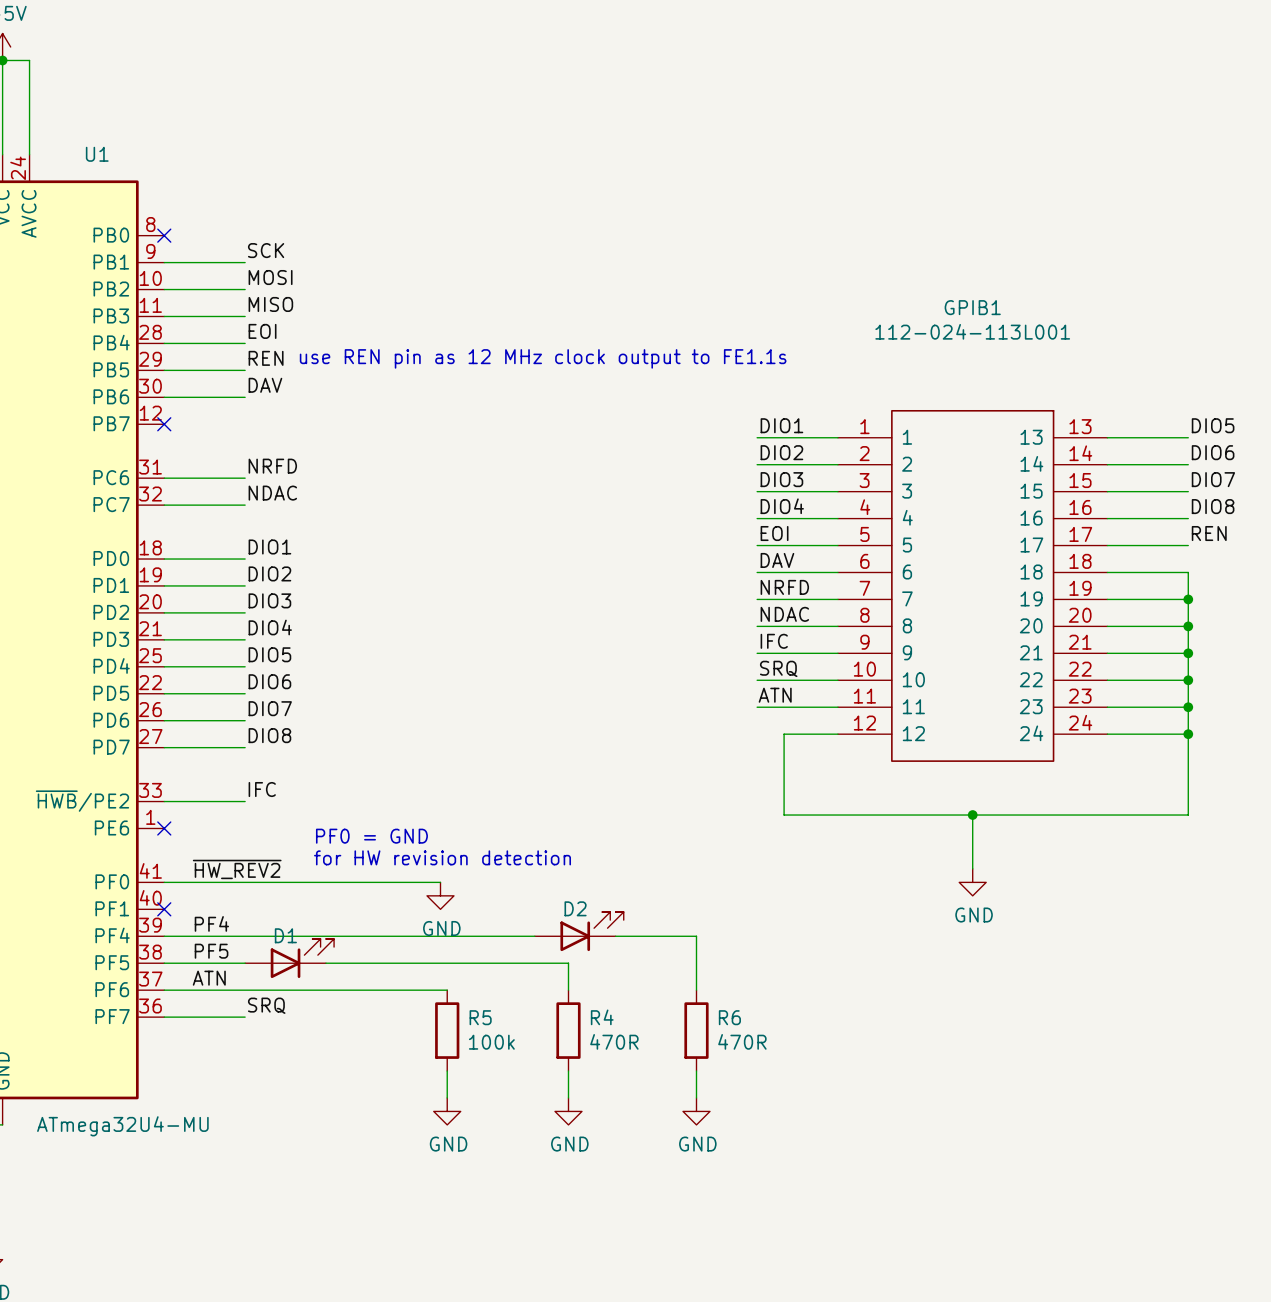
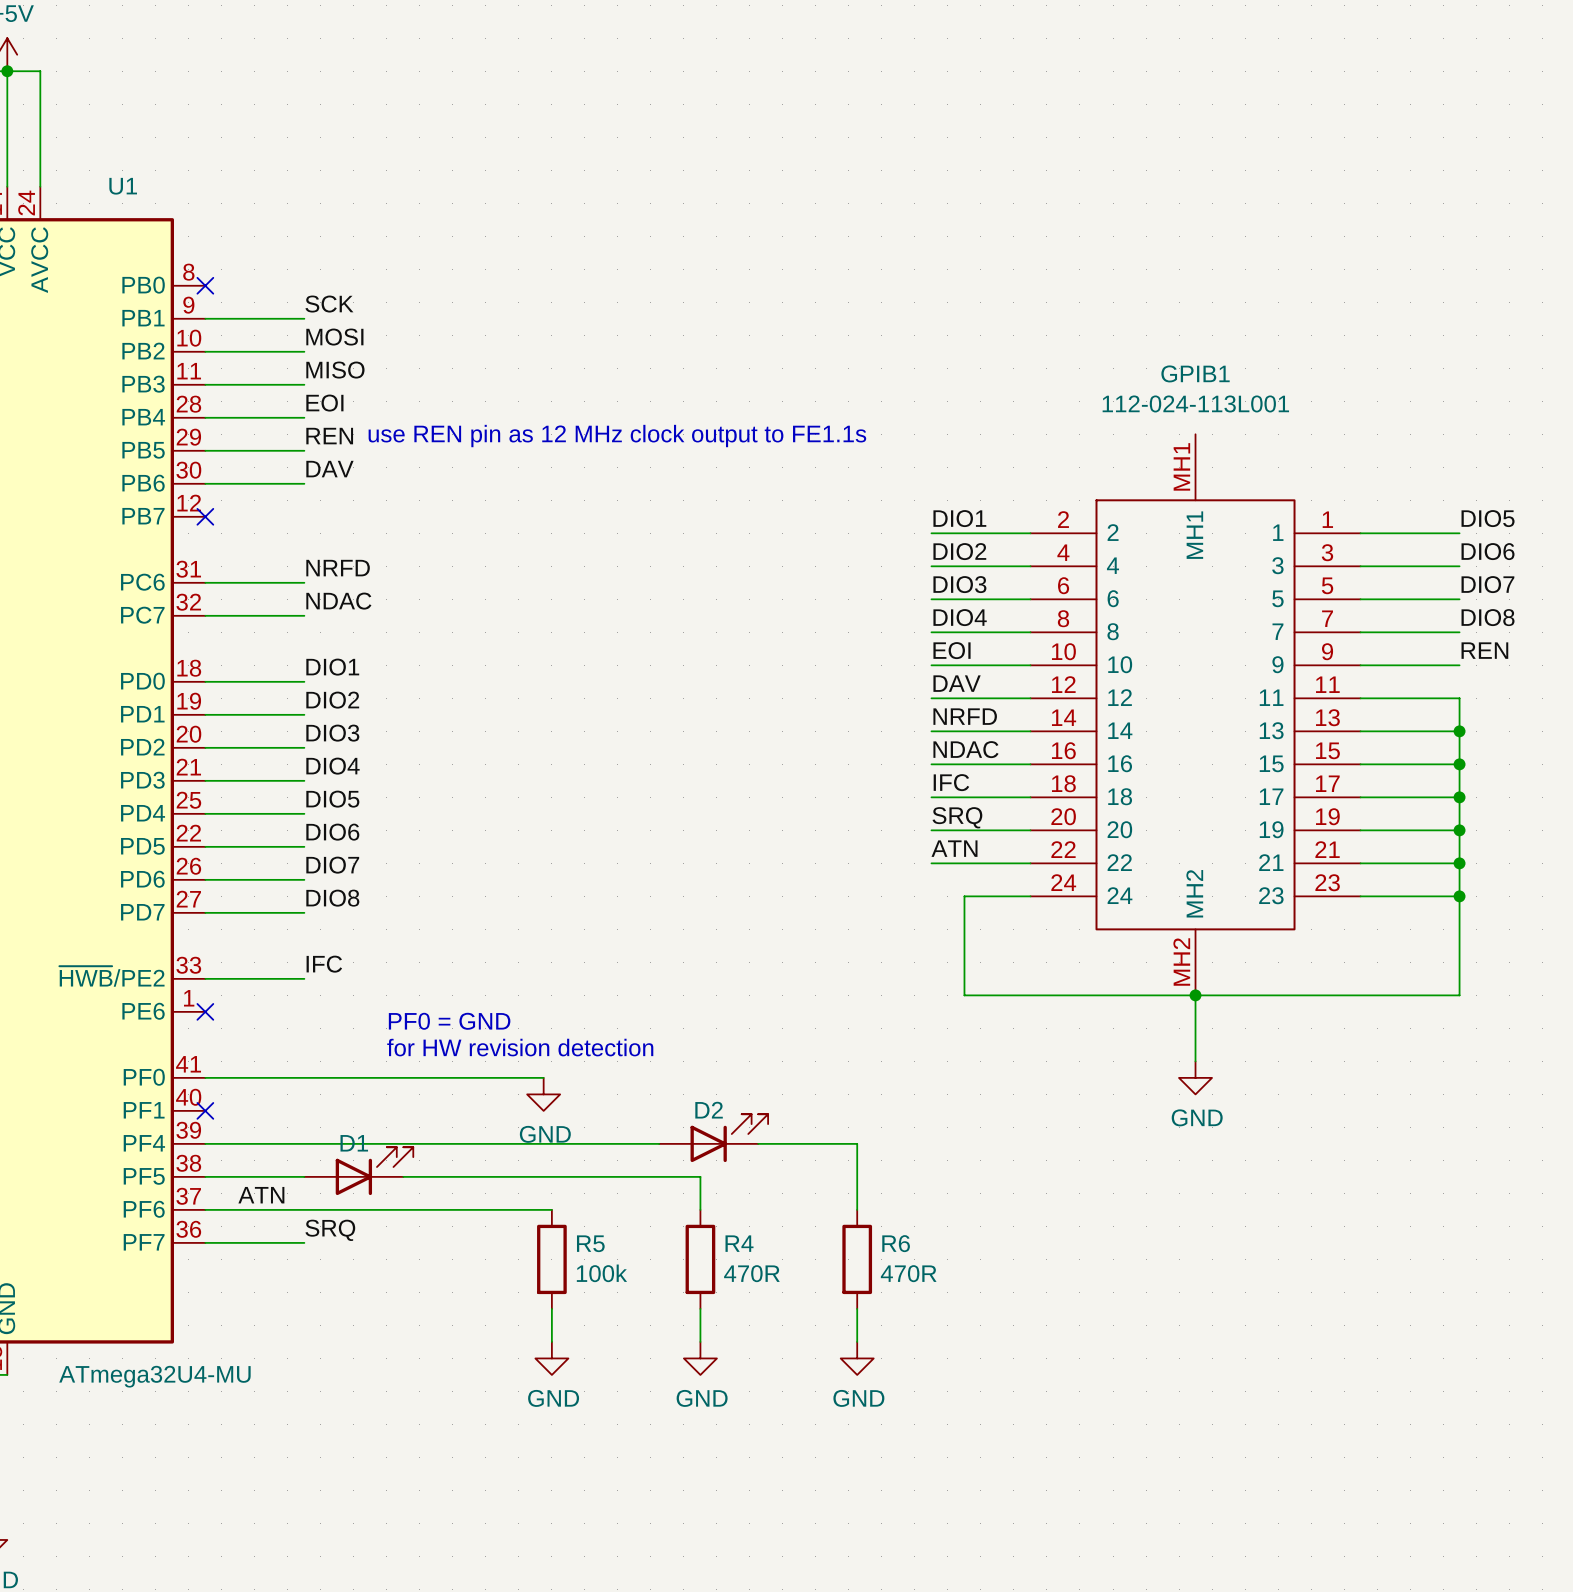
GPIB1 symbol: [837, 409, 1108, 762] -> [1030, 434, 1361, 996]
label: ~{HW_REV2} (237, 869) -> none
label: PF4 (211, 923) -> none
label: PF5 (211, 951) -> none

